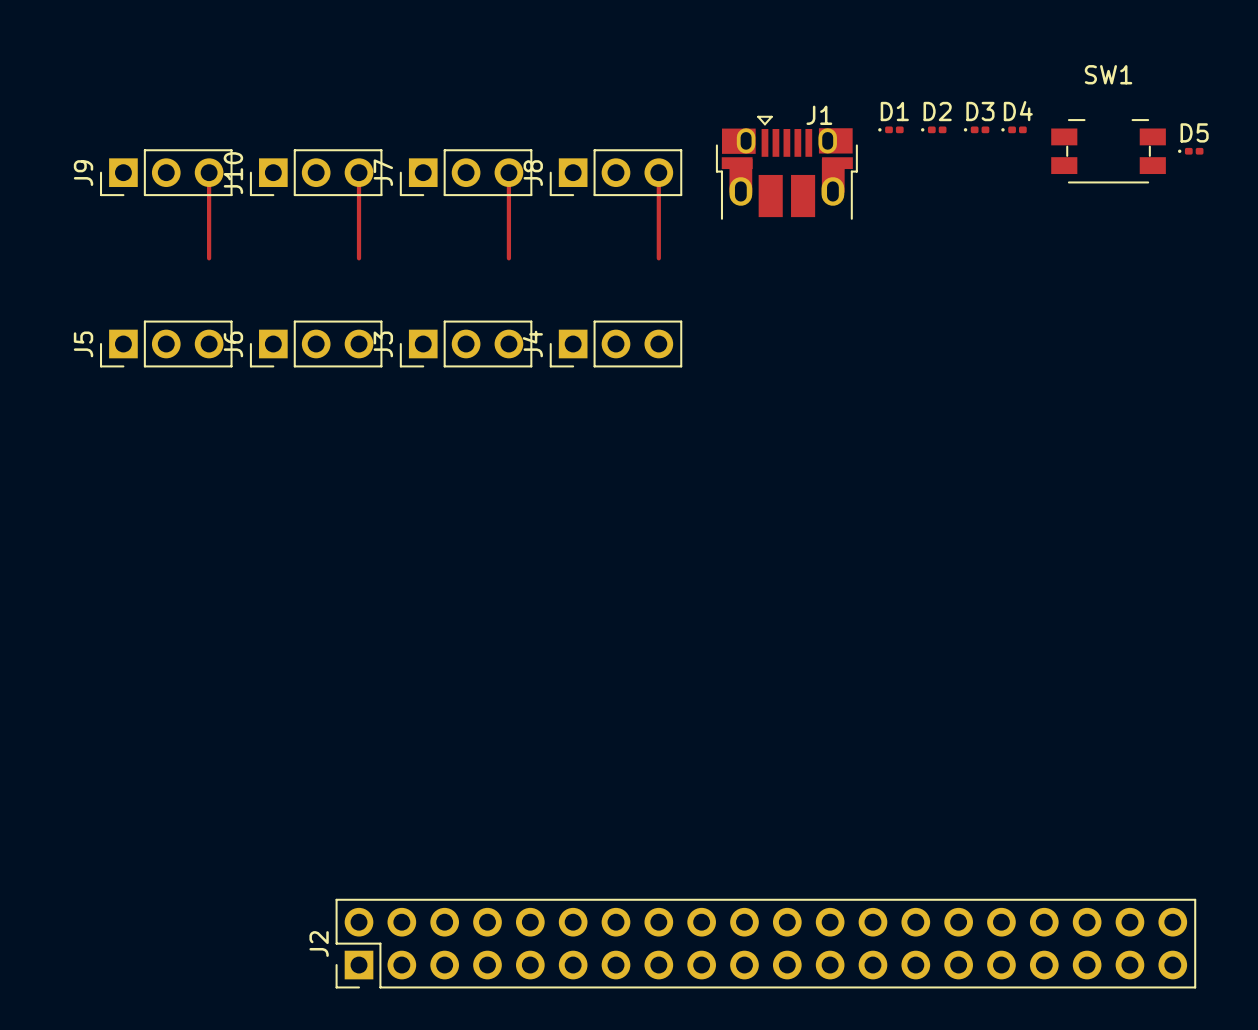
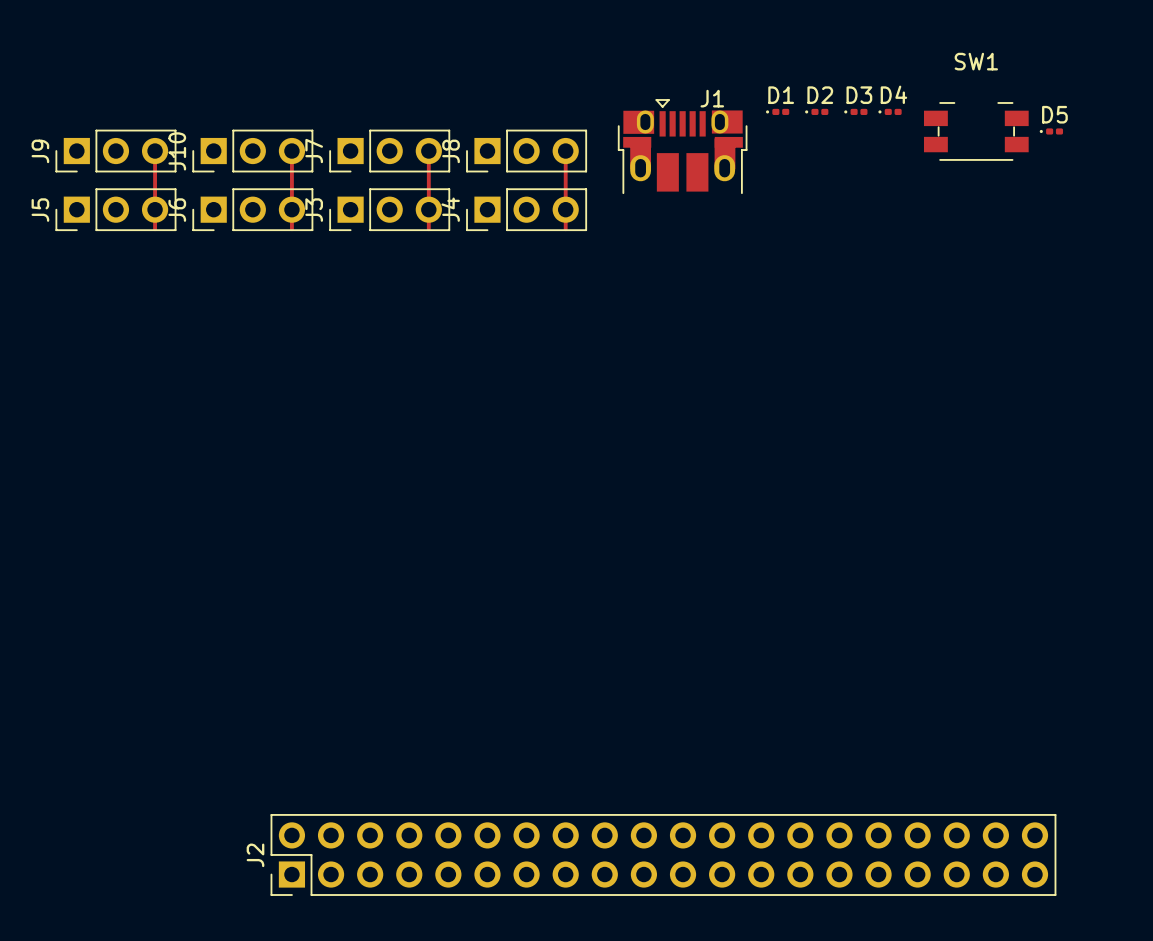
J5 position: (166, 343) -> (115, 209)
J6 position: (316, 343) -> (252, 209)
J3 position: (466, 343) -> (389, 209)
J4 position: (615, 343) -> (526, 209)

